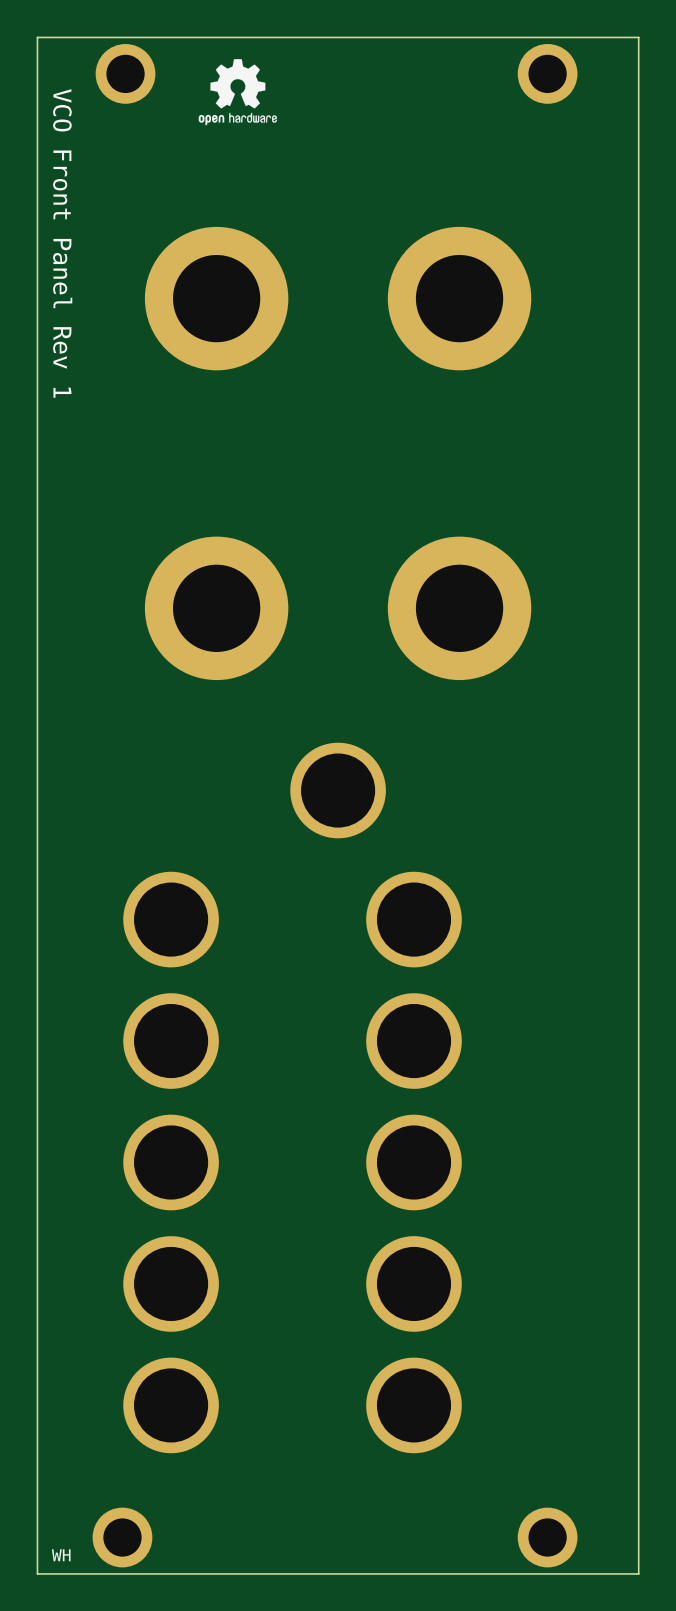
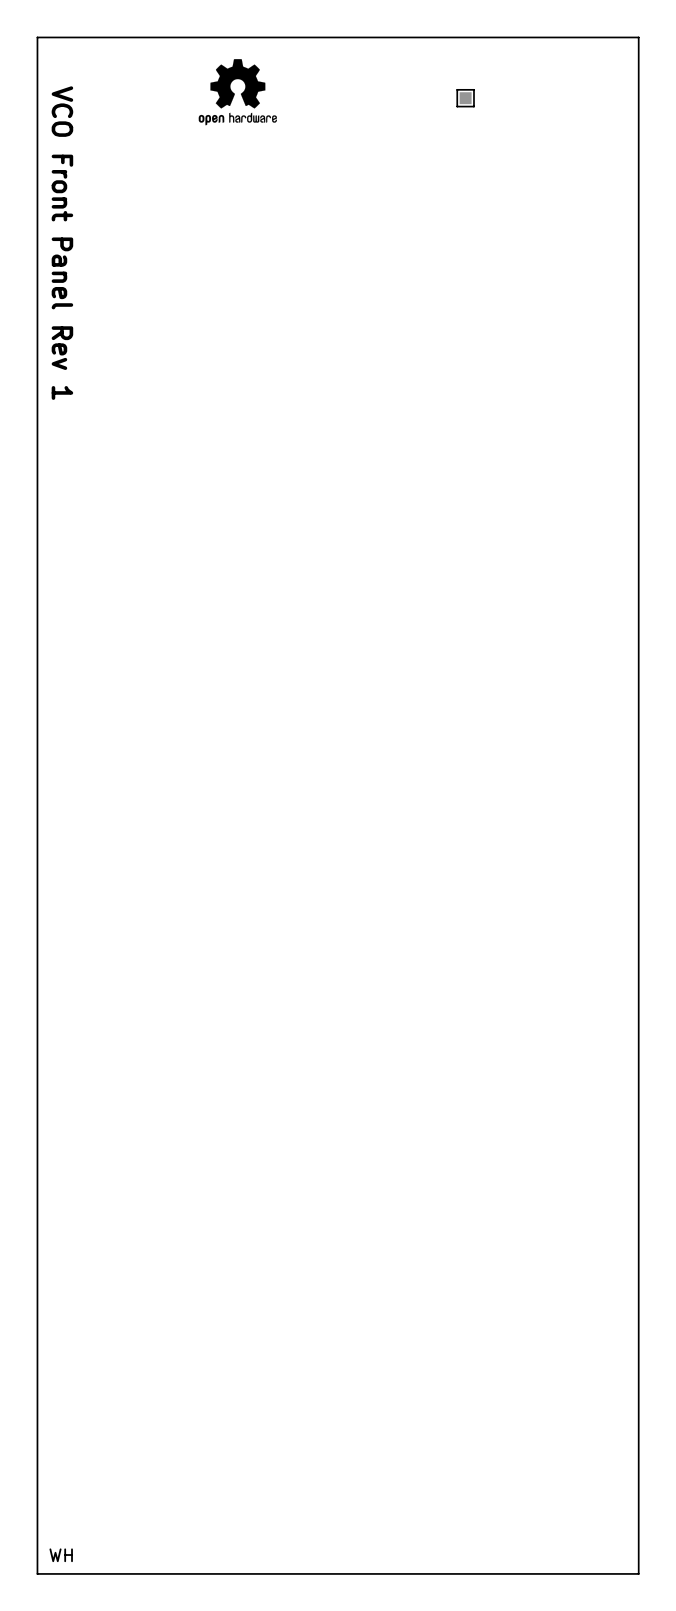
part: (125, 73) -> none
part: (547, 73) -> none
part: none -> (465, 98)
part: (216, 298) -> none
part: (459, 298) -> none
part: (216, 608) -> none
part: (459, 608) -> none
part: (338, 790) -> none
part: (171, 919) -> none
part: (414, 919) -> none
part: (171, 1041) -> none
part: (414, 1041) -> none
part: (171, 1162) -> none
part: (414, 1162) -> none
part: (171, 1283) -> none
part: (414, 1283) -> none
part: (171, 1405) -> none
part: (414, 1405) -> none
part: (122, 1537) -> none
part: (547, 1537) -> none

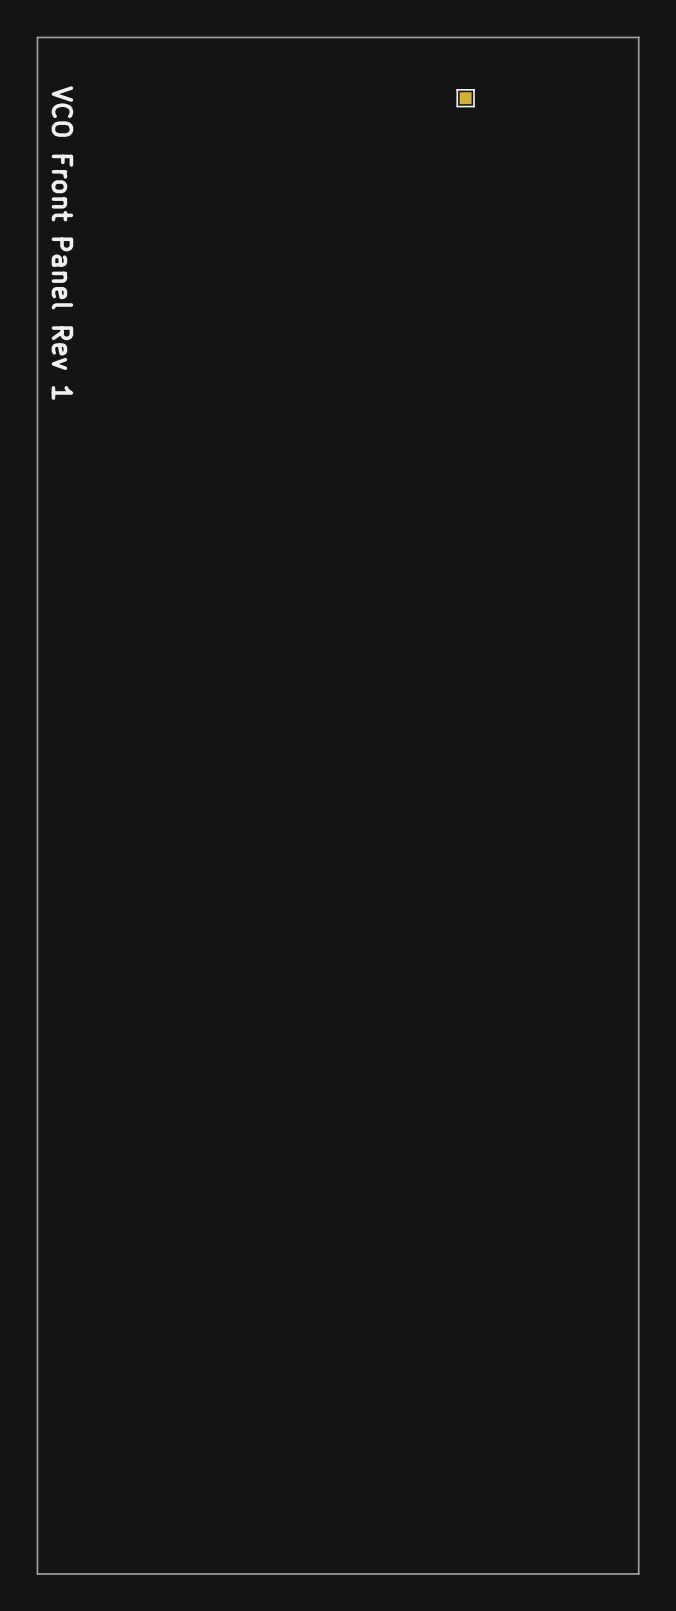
drawing: [198, 59, 277, 126] -> none
text: WH (61, 1555) -> none

